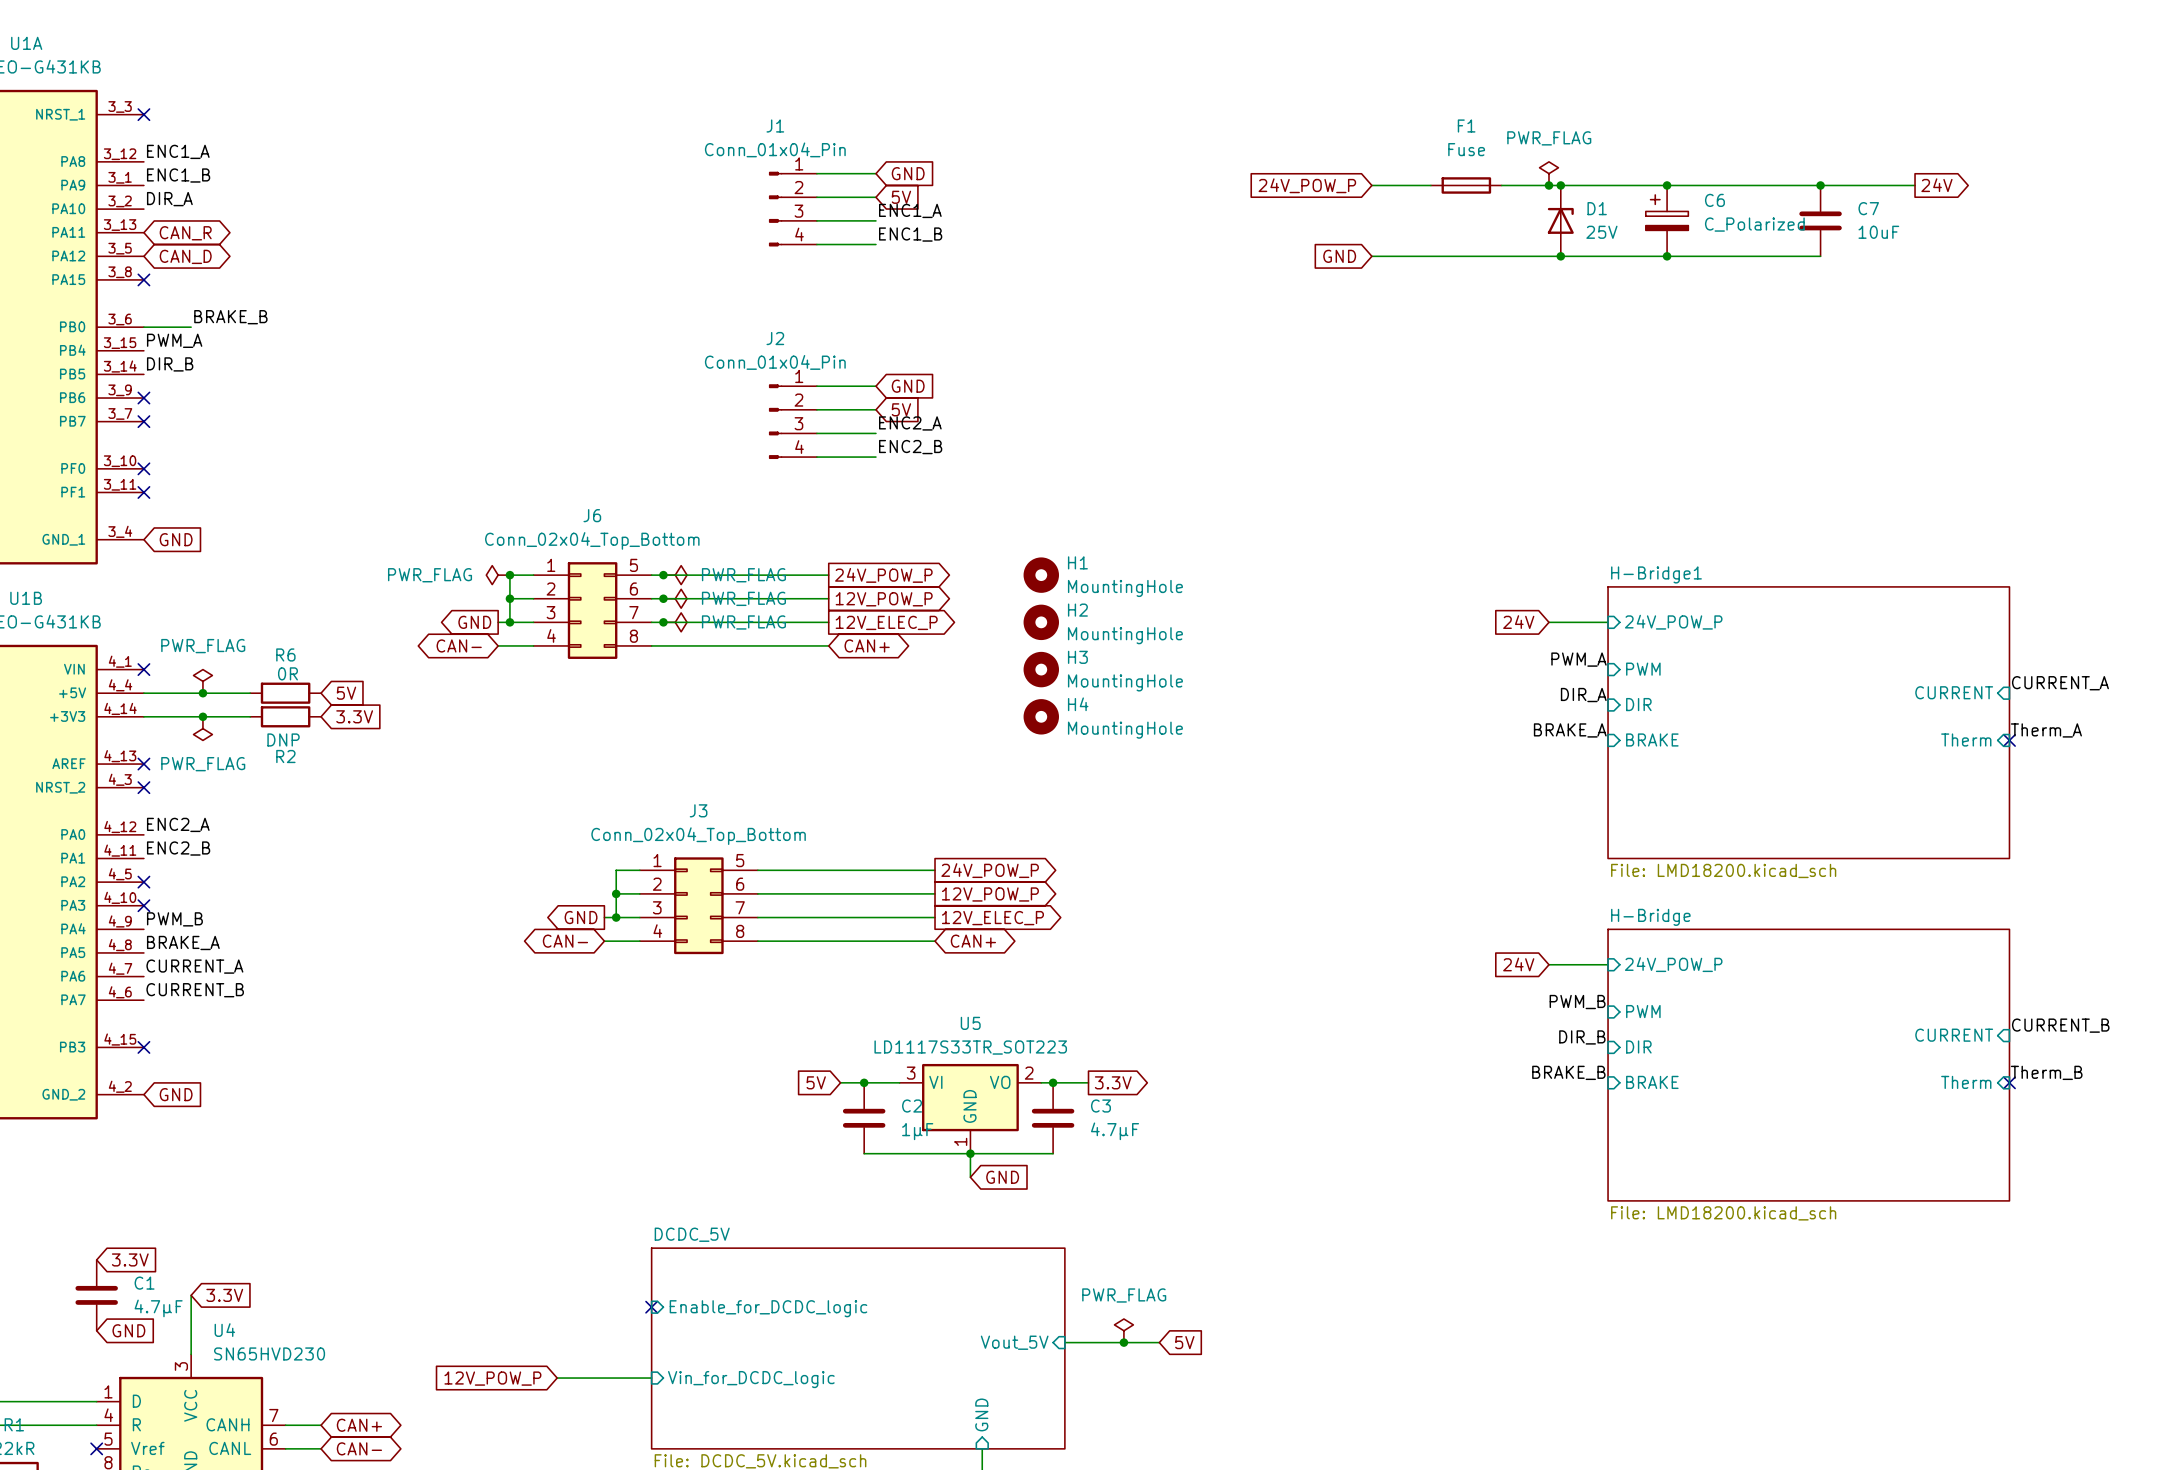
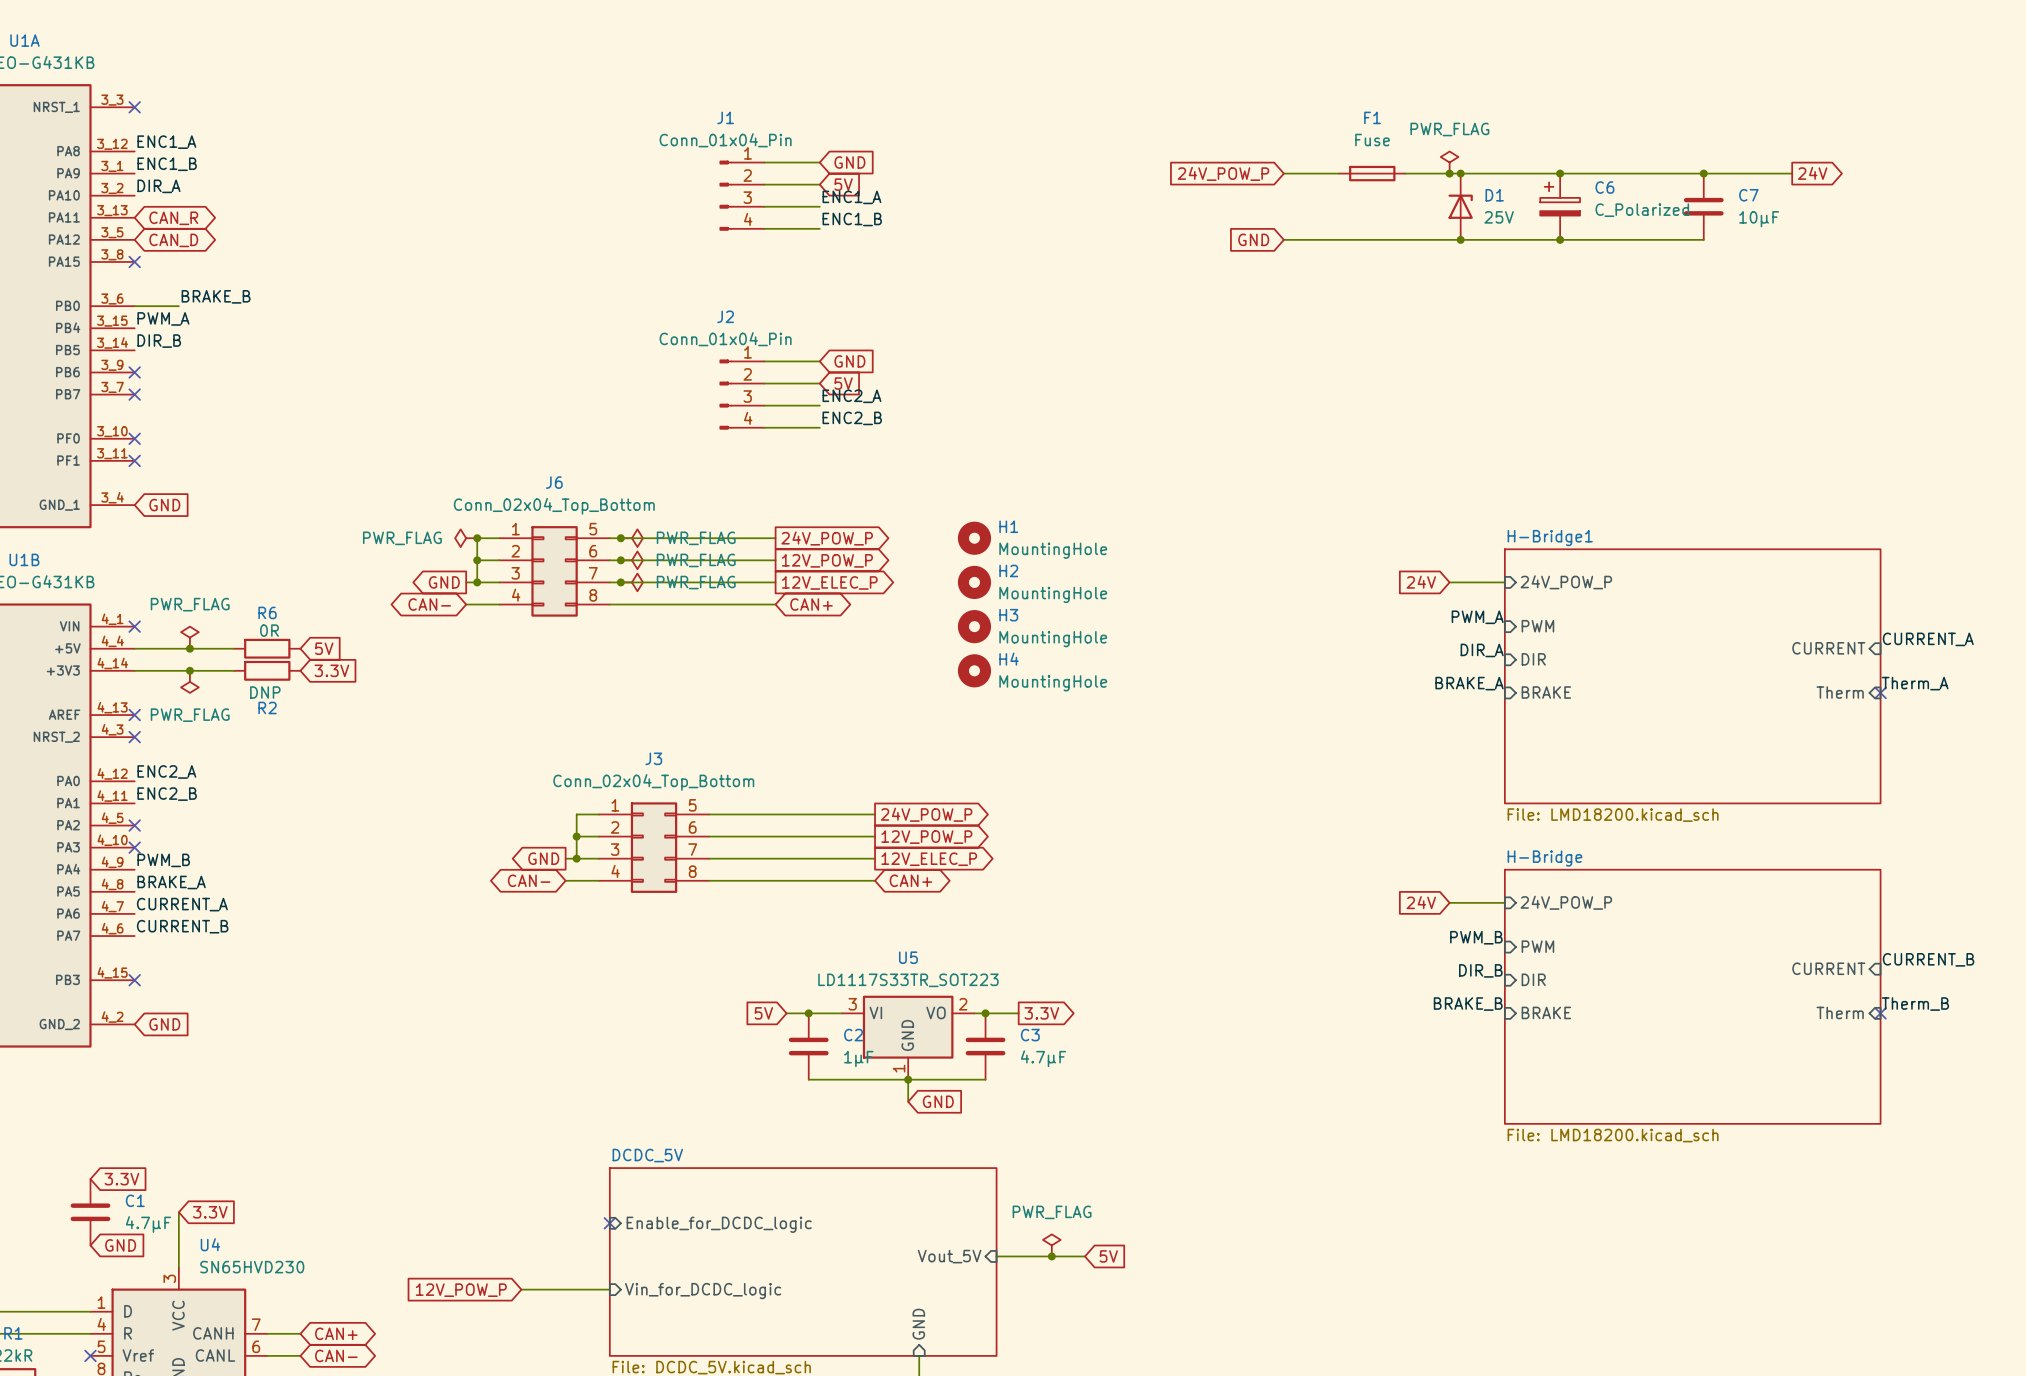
C7 value: 10uF (1878, 232) -> 10µF (1759, 219)

